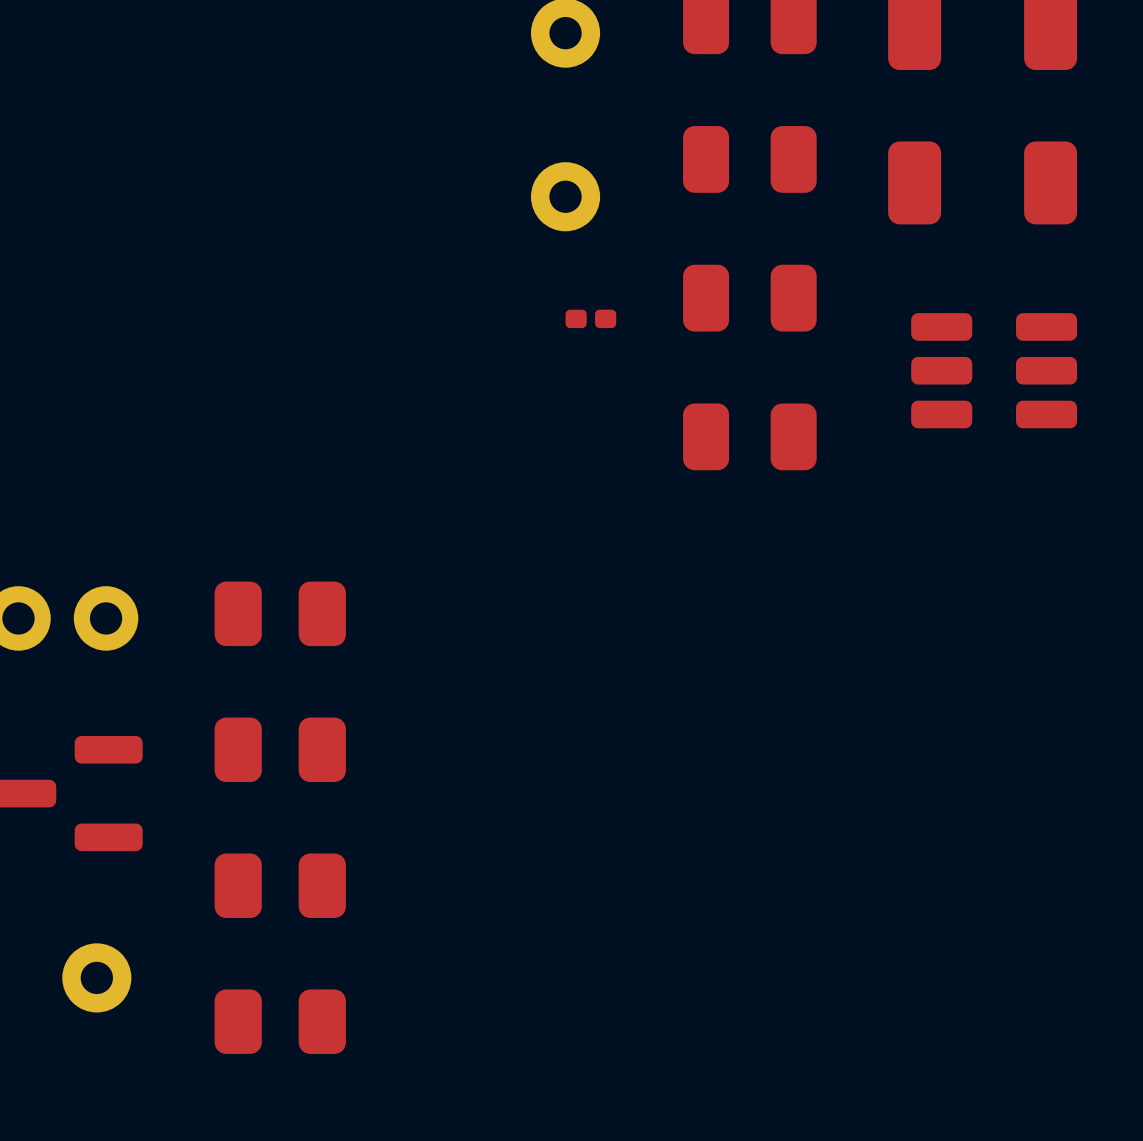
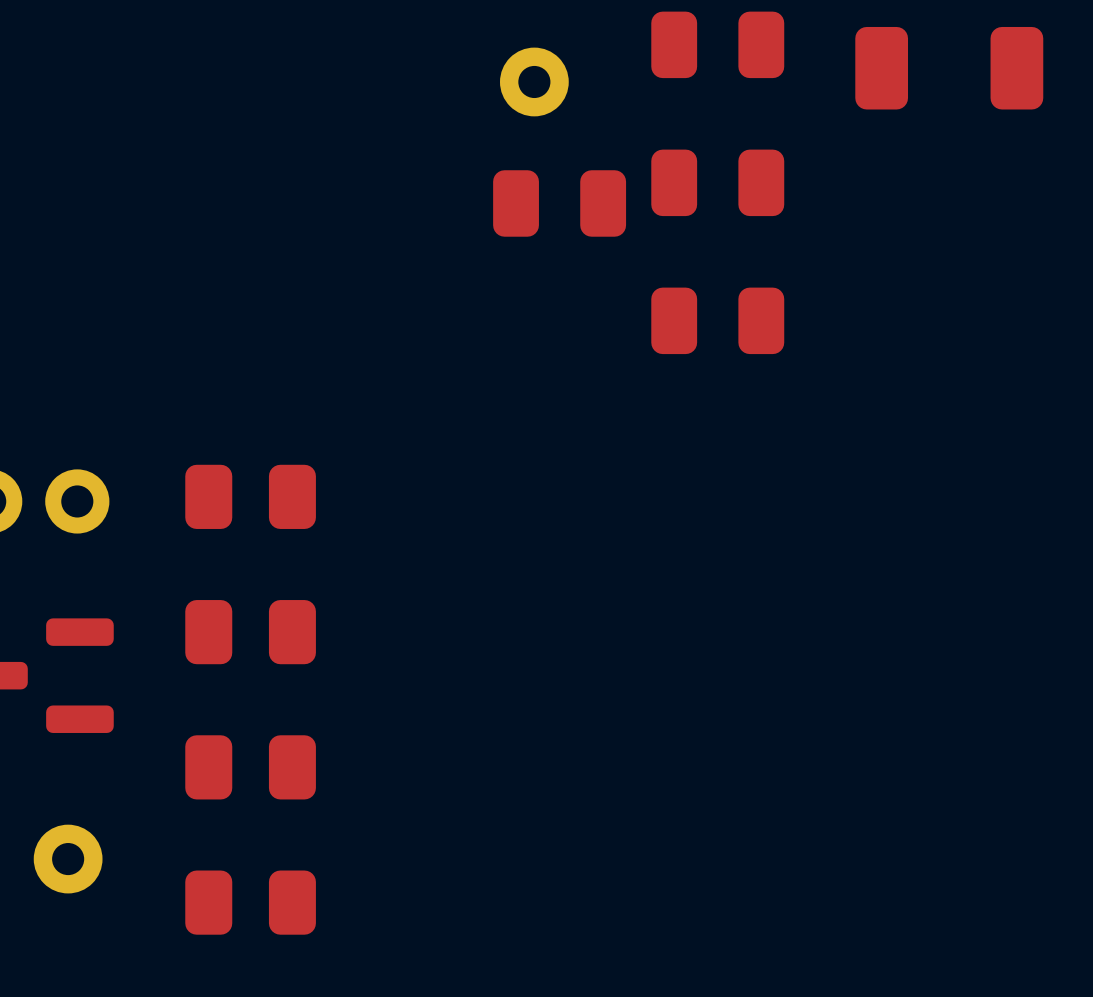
part footprint: [565, 309, 617, 329] -> [493, 170, 627, 237]
part: (994, 370) -> none

